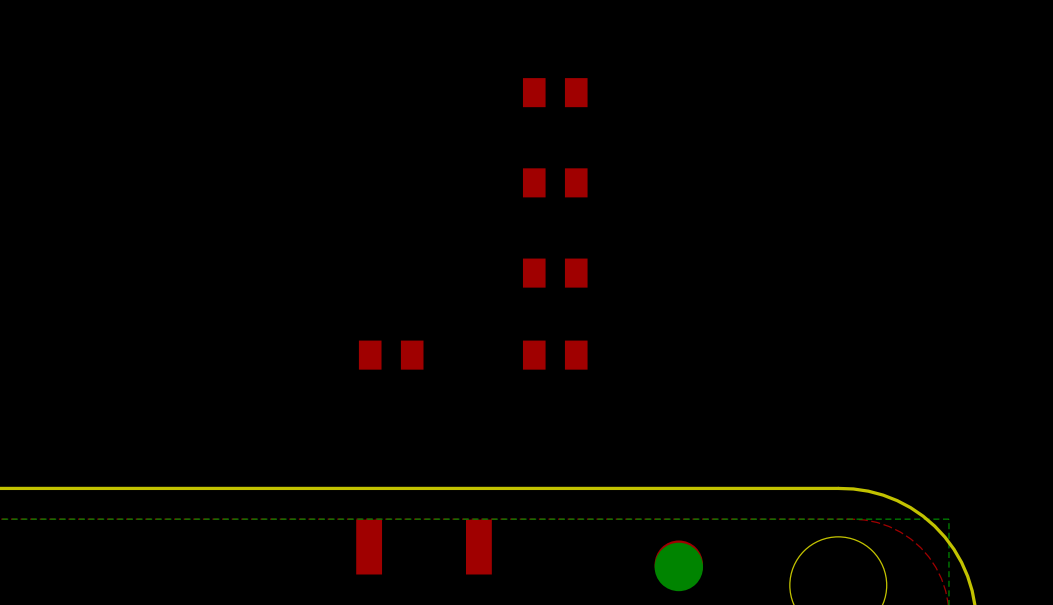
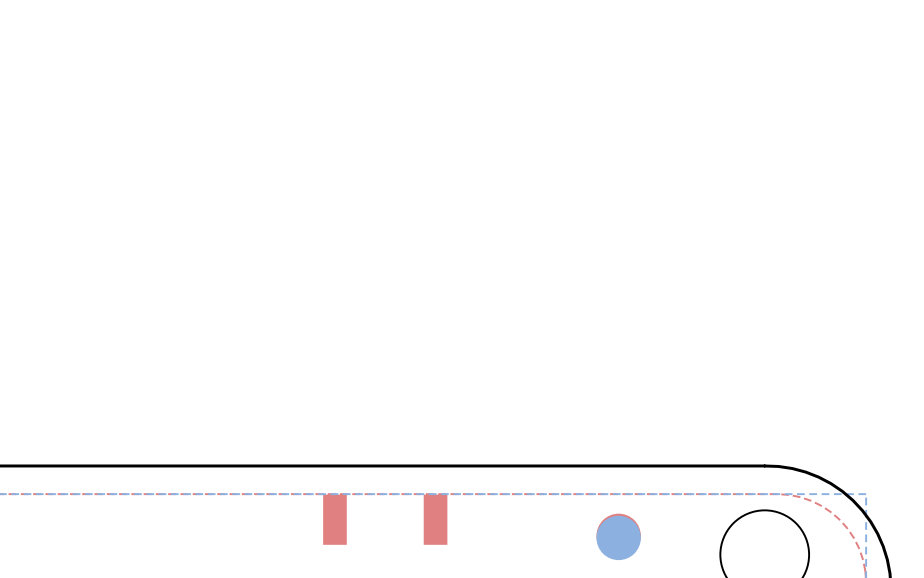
part: (555, 92) -> none
part: (555, 182) -> none
part: (555, 273) -> none
part: (391, 355) -> none
part: (555, 355) -> none

